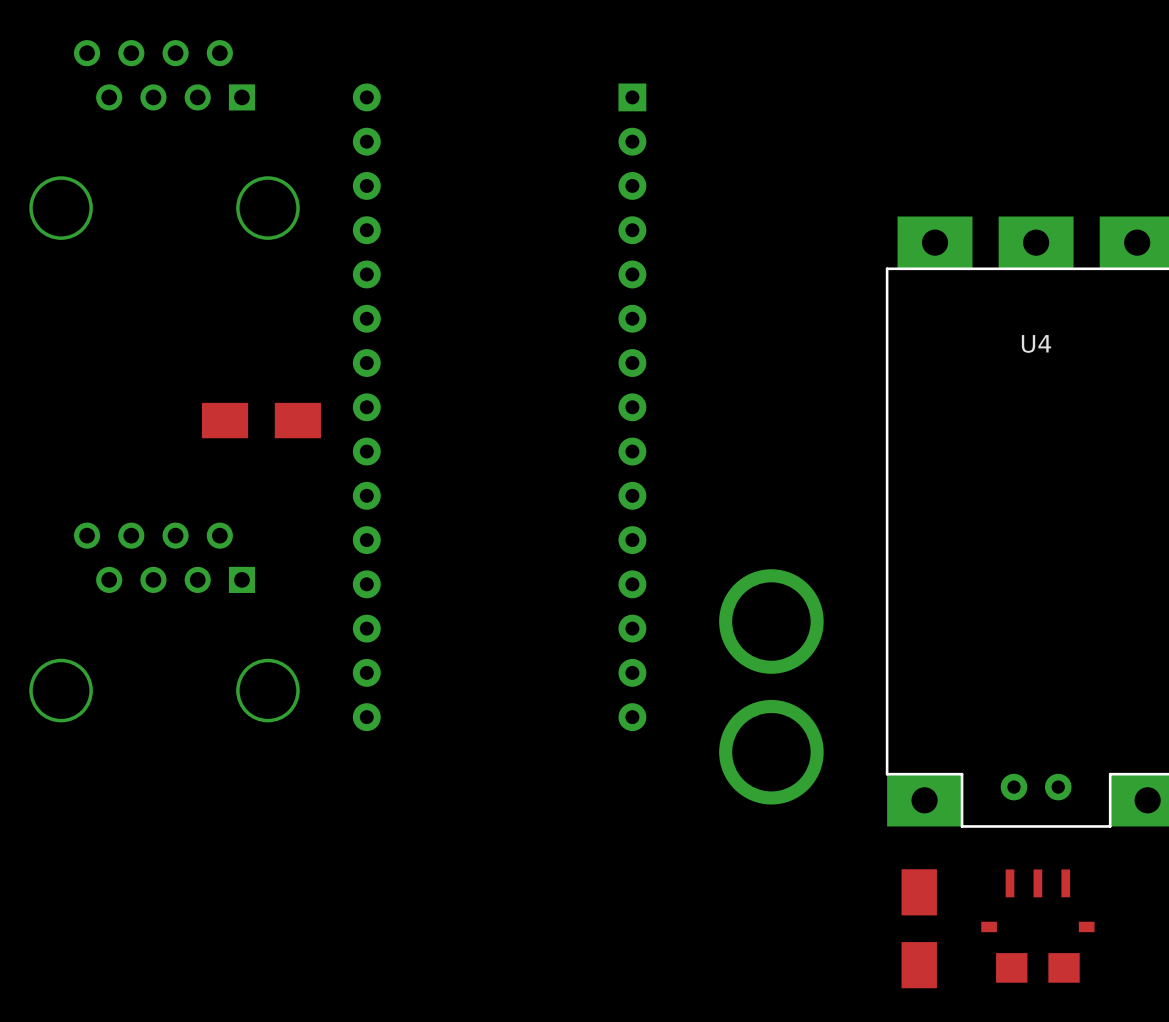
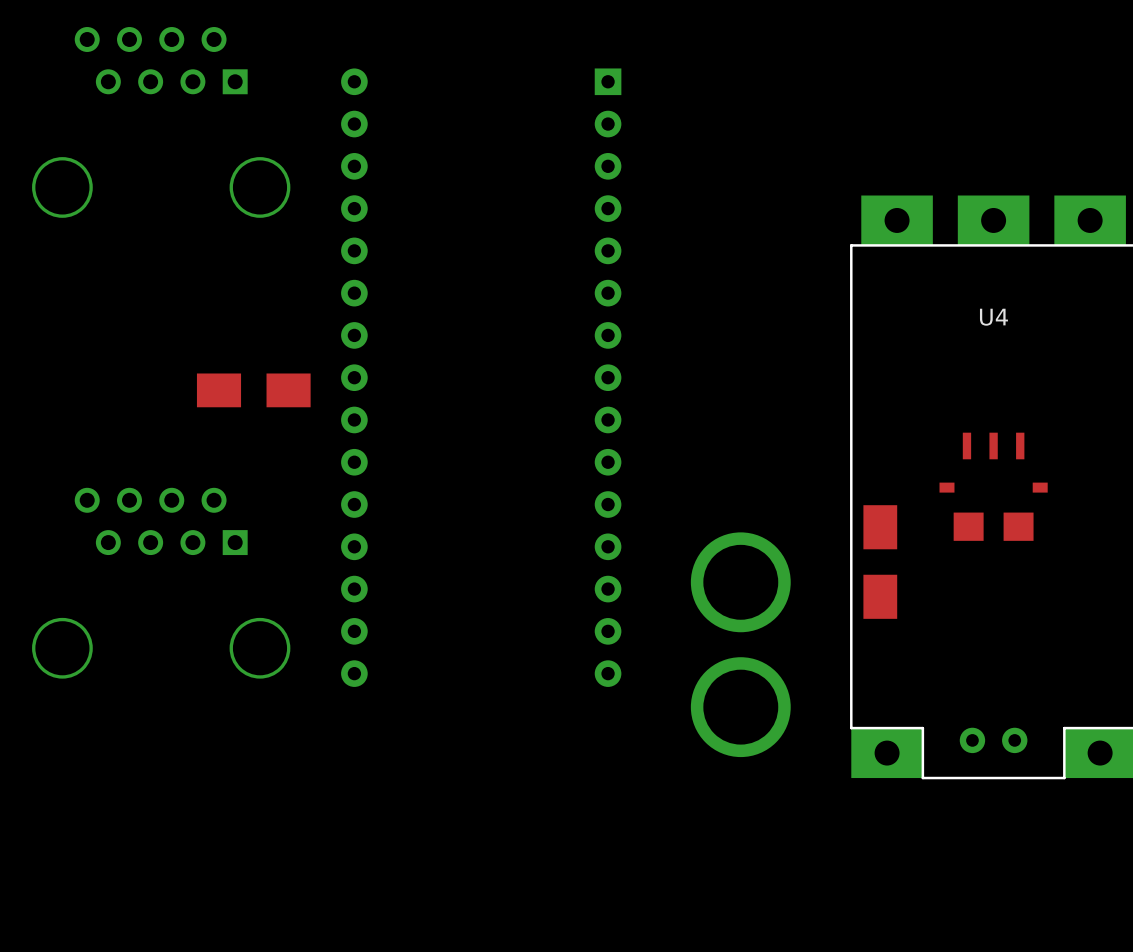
part position: (1037, 926) -> (993, 486)
part position: (919, 928) -> (880, 562)

